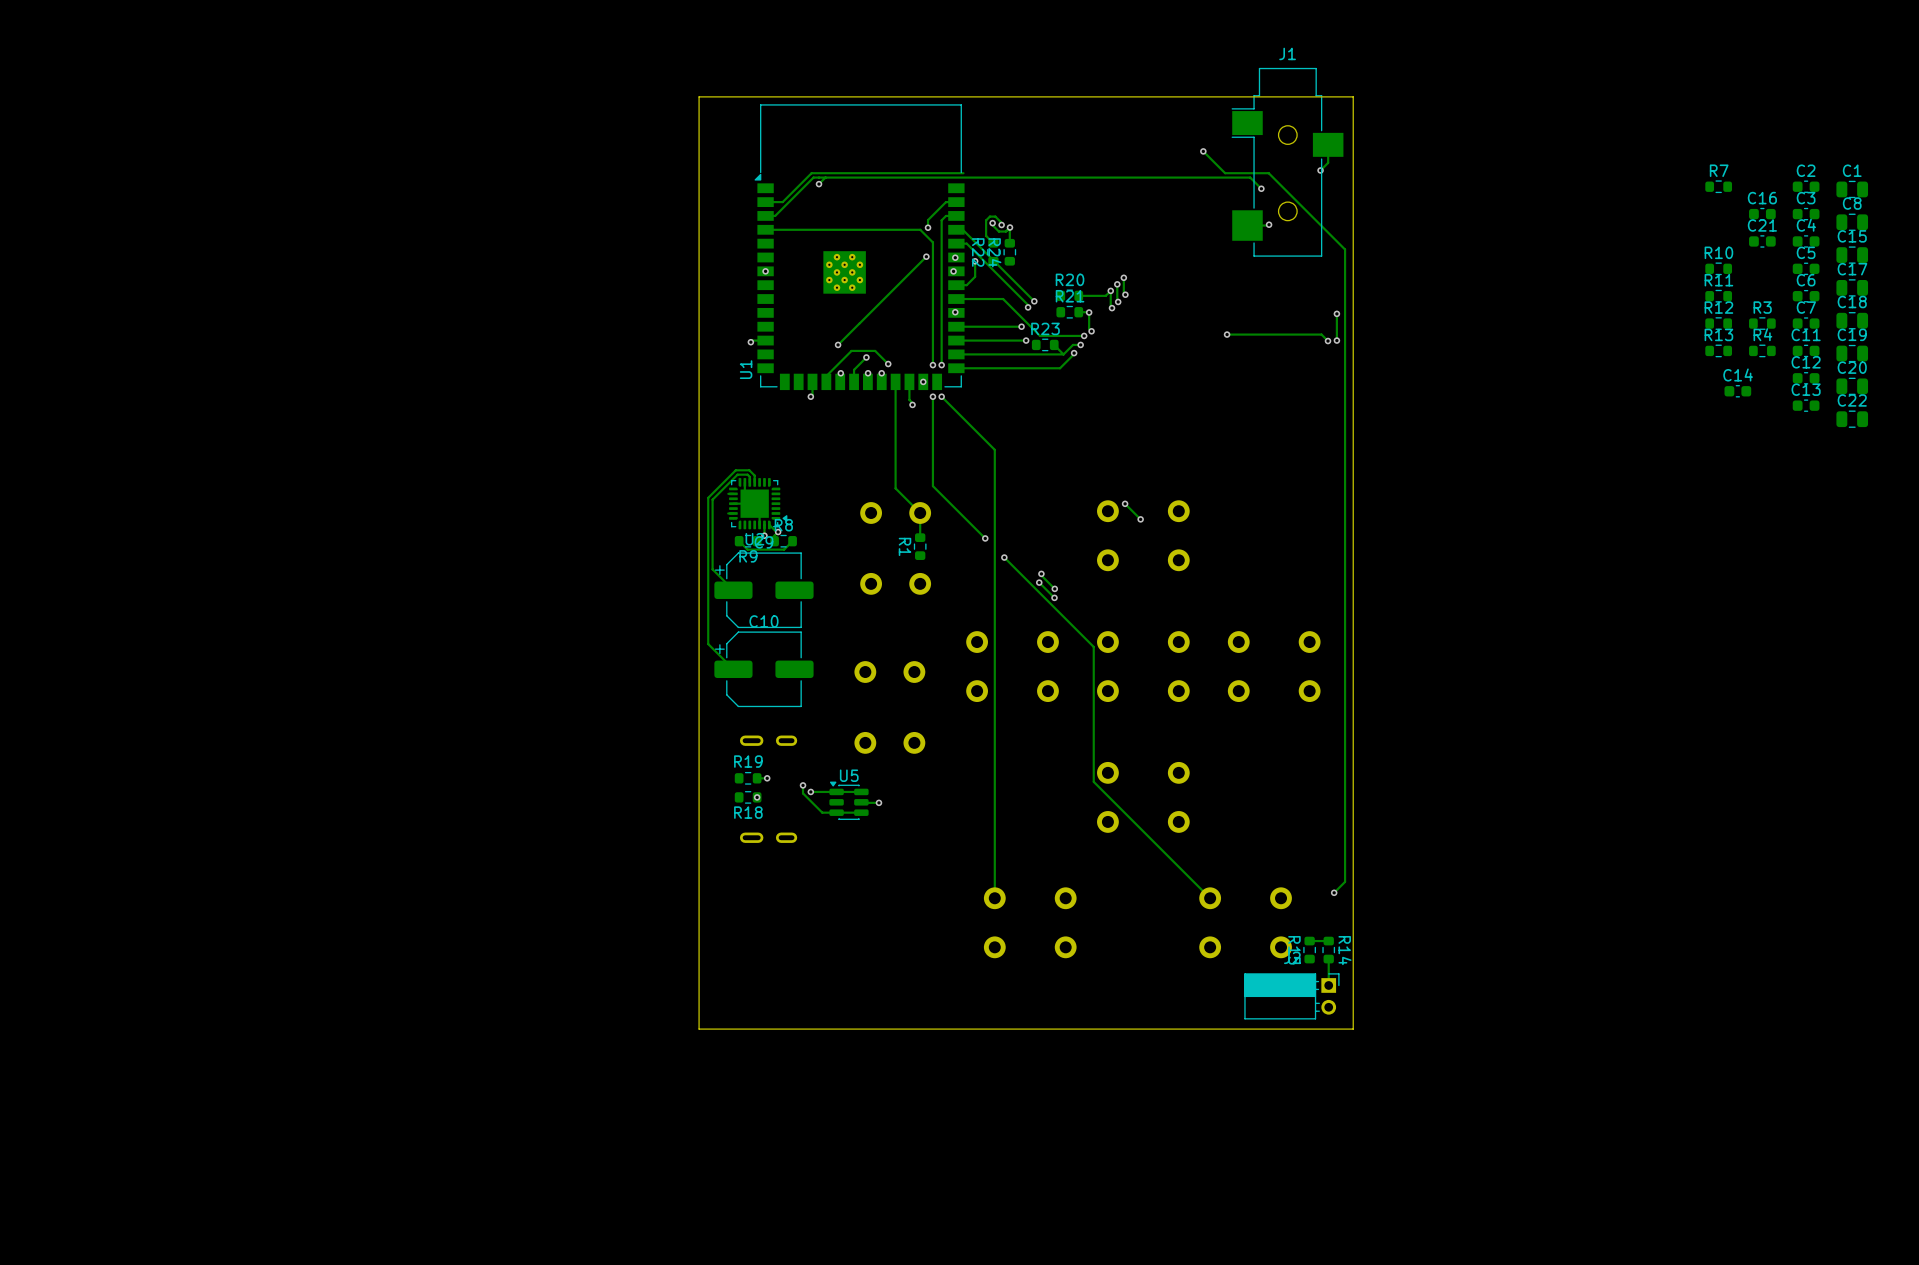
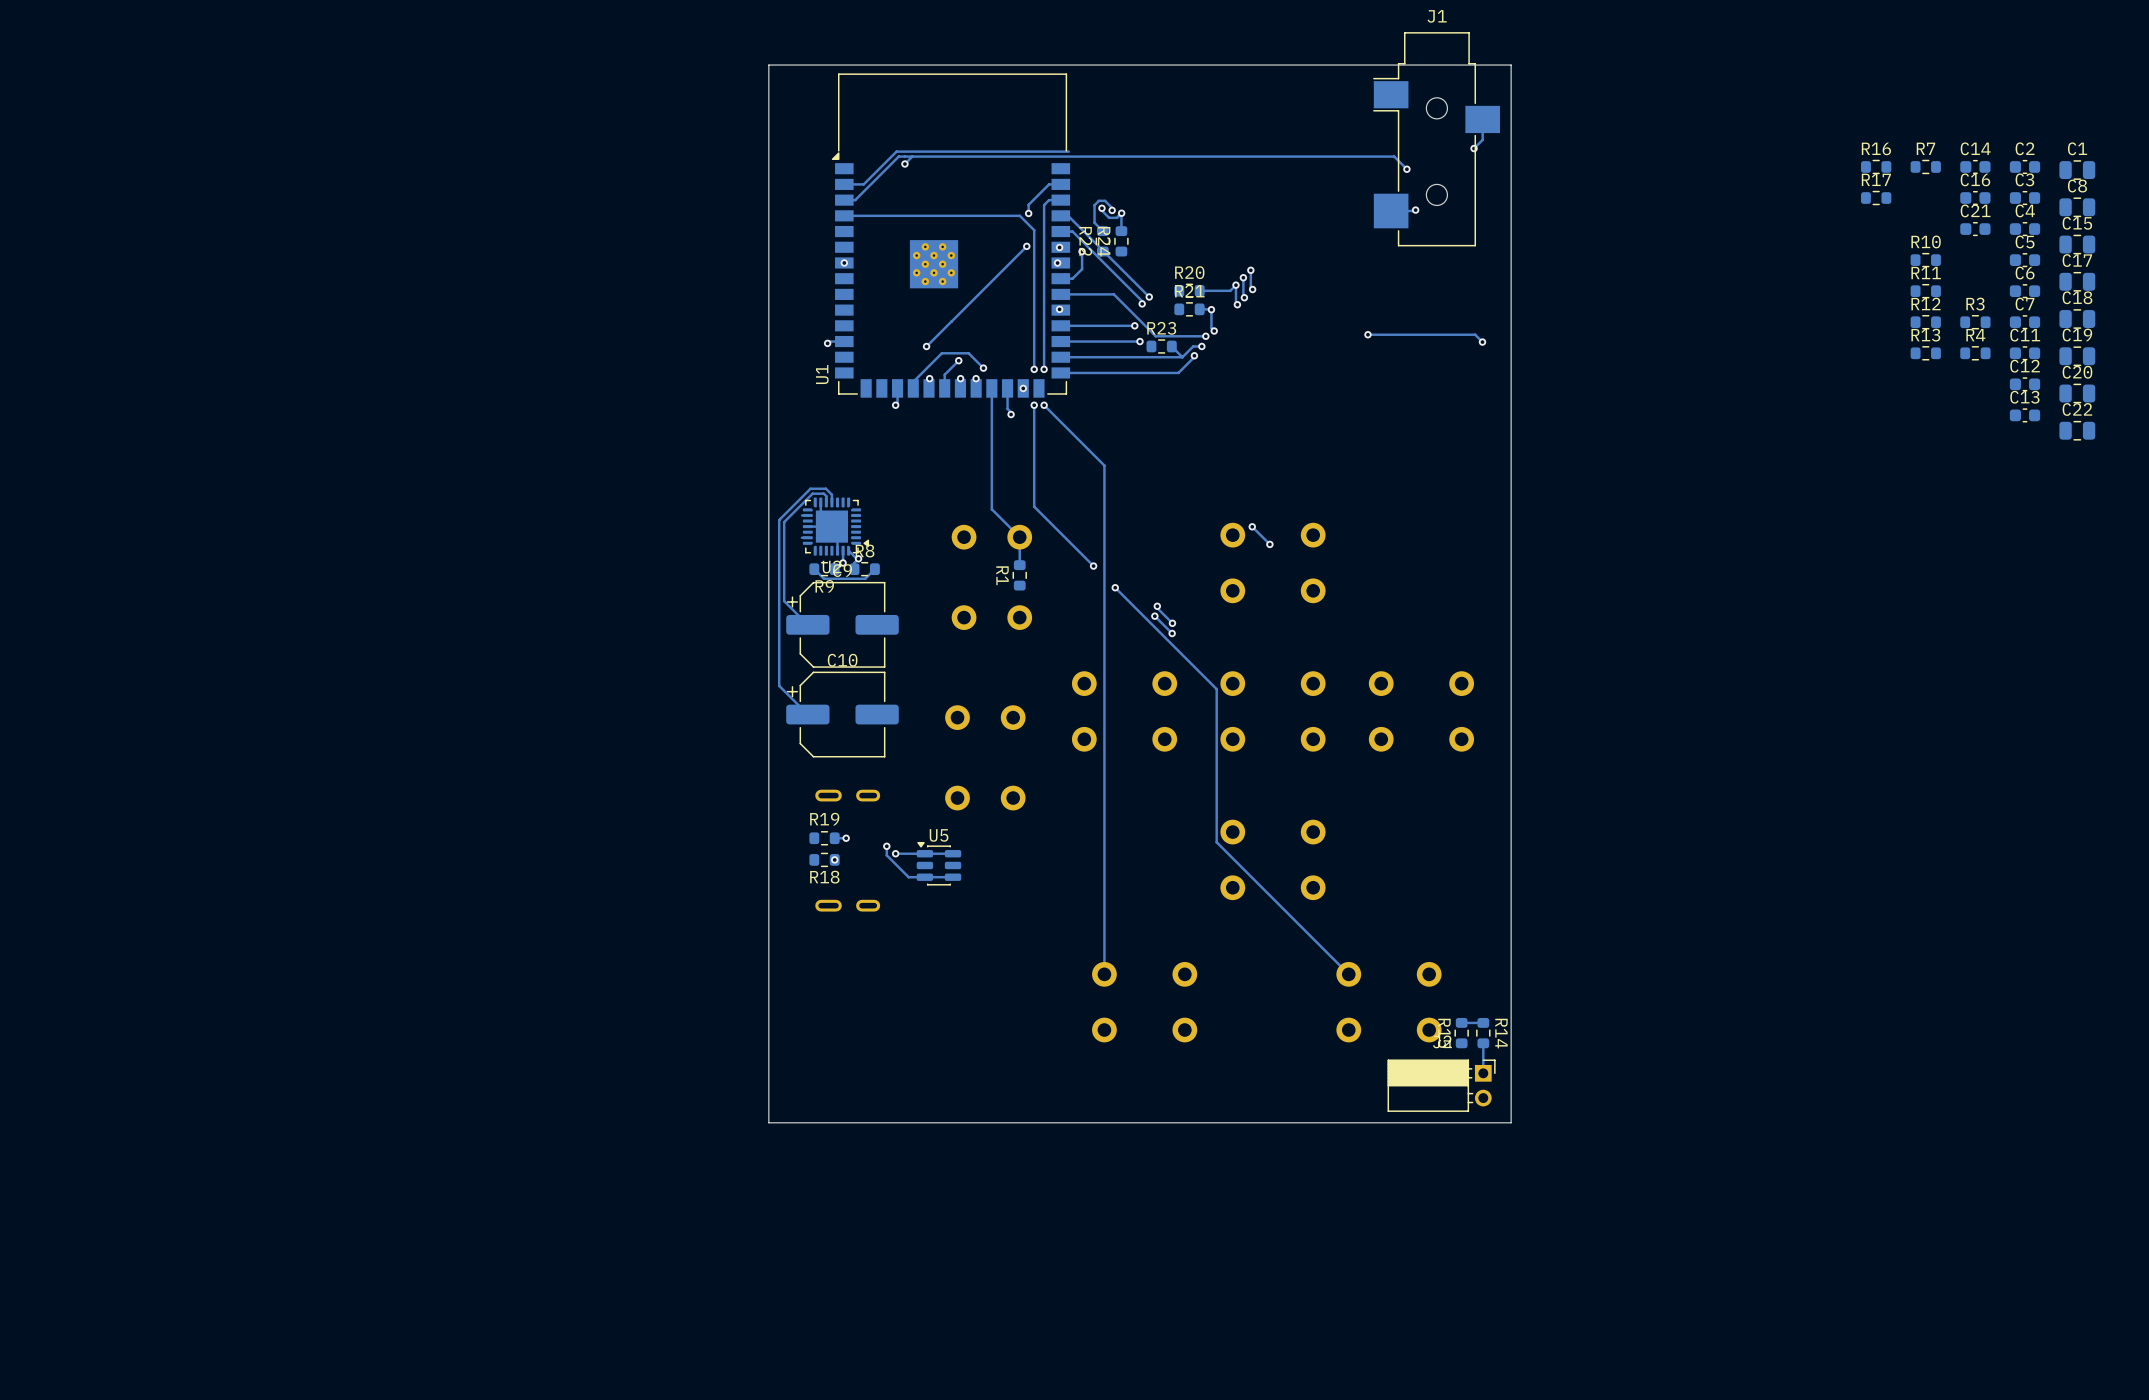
track: (1203, 151) (1225, 173) (1268, 173) (1345, 249) (1345, 881) (1334, 892) -> none
via: (1203, 151) -> none
R16: none -> (1876, 166)
R17: none -> (1876, 198)
track: (1336, 313) (1336, 340) -> none
via: (1336, 313) -> none
via: (1336, 340) -> none
C14 position: (1737, 391) -> (1975, 166)
track: (861, 802) (878, 802) -> none
via: (878, 802) -> none
via: (1334, 892) -> none

